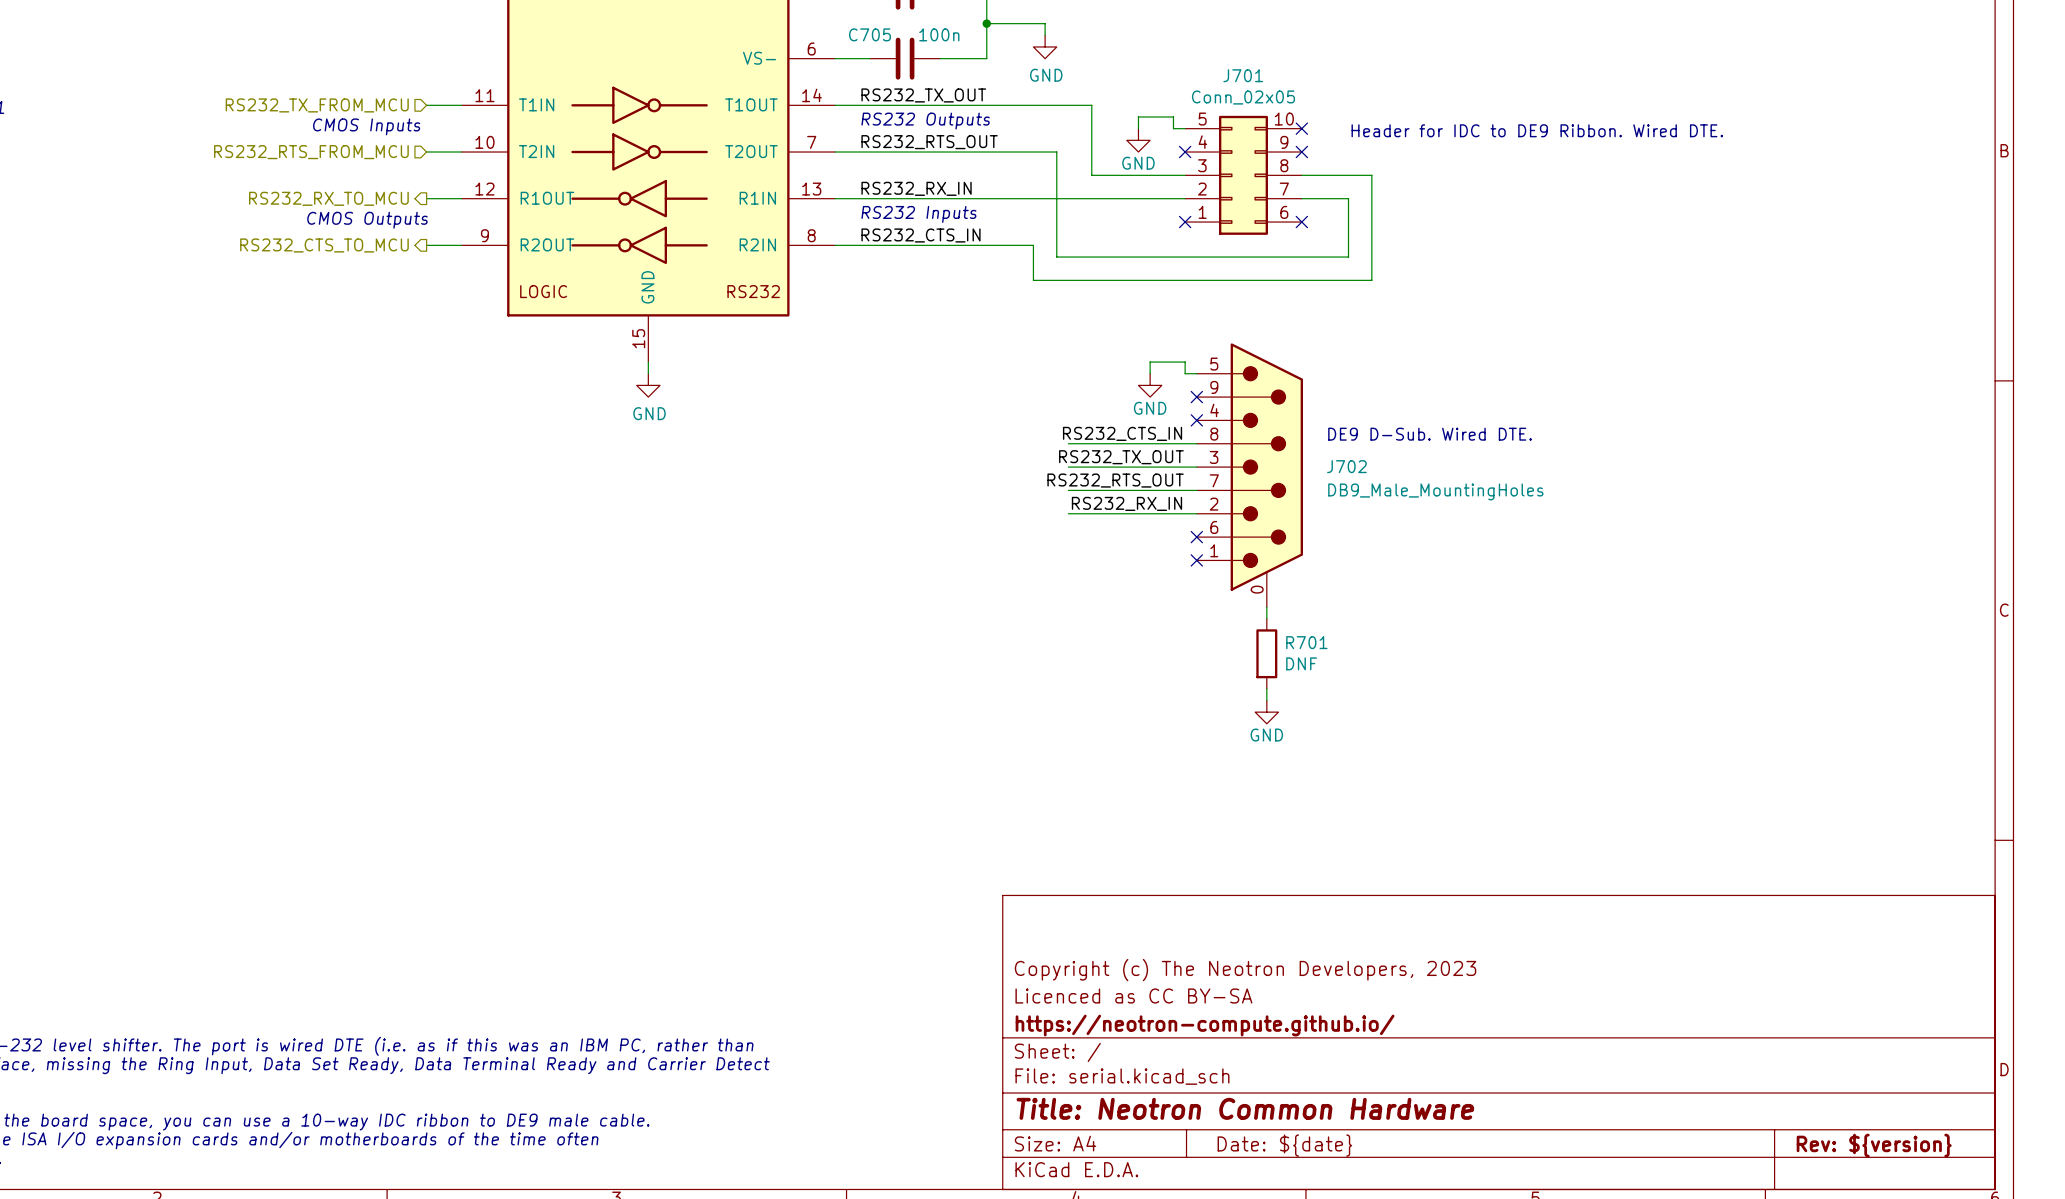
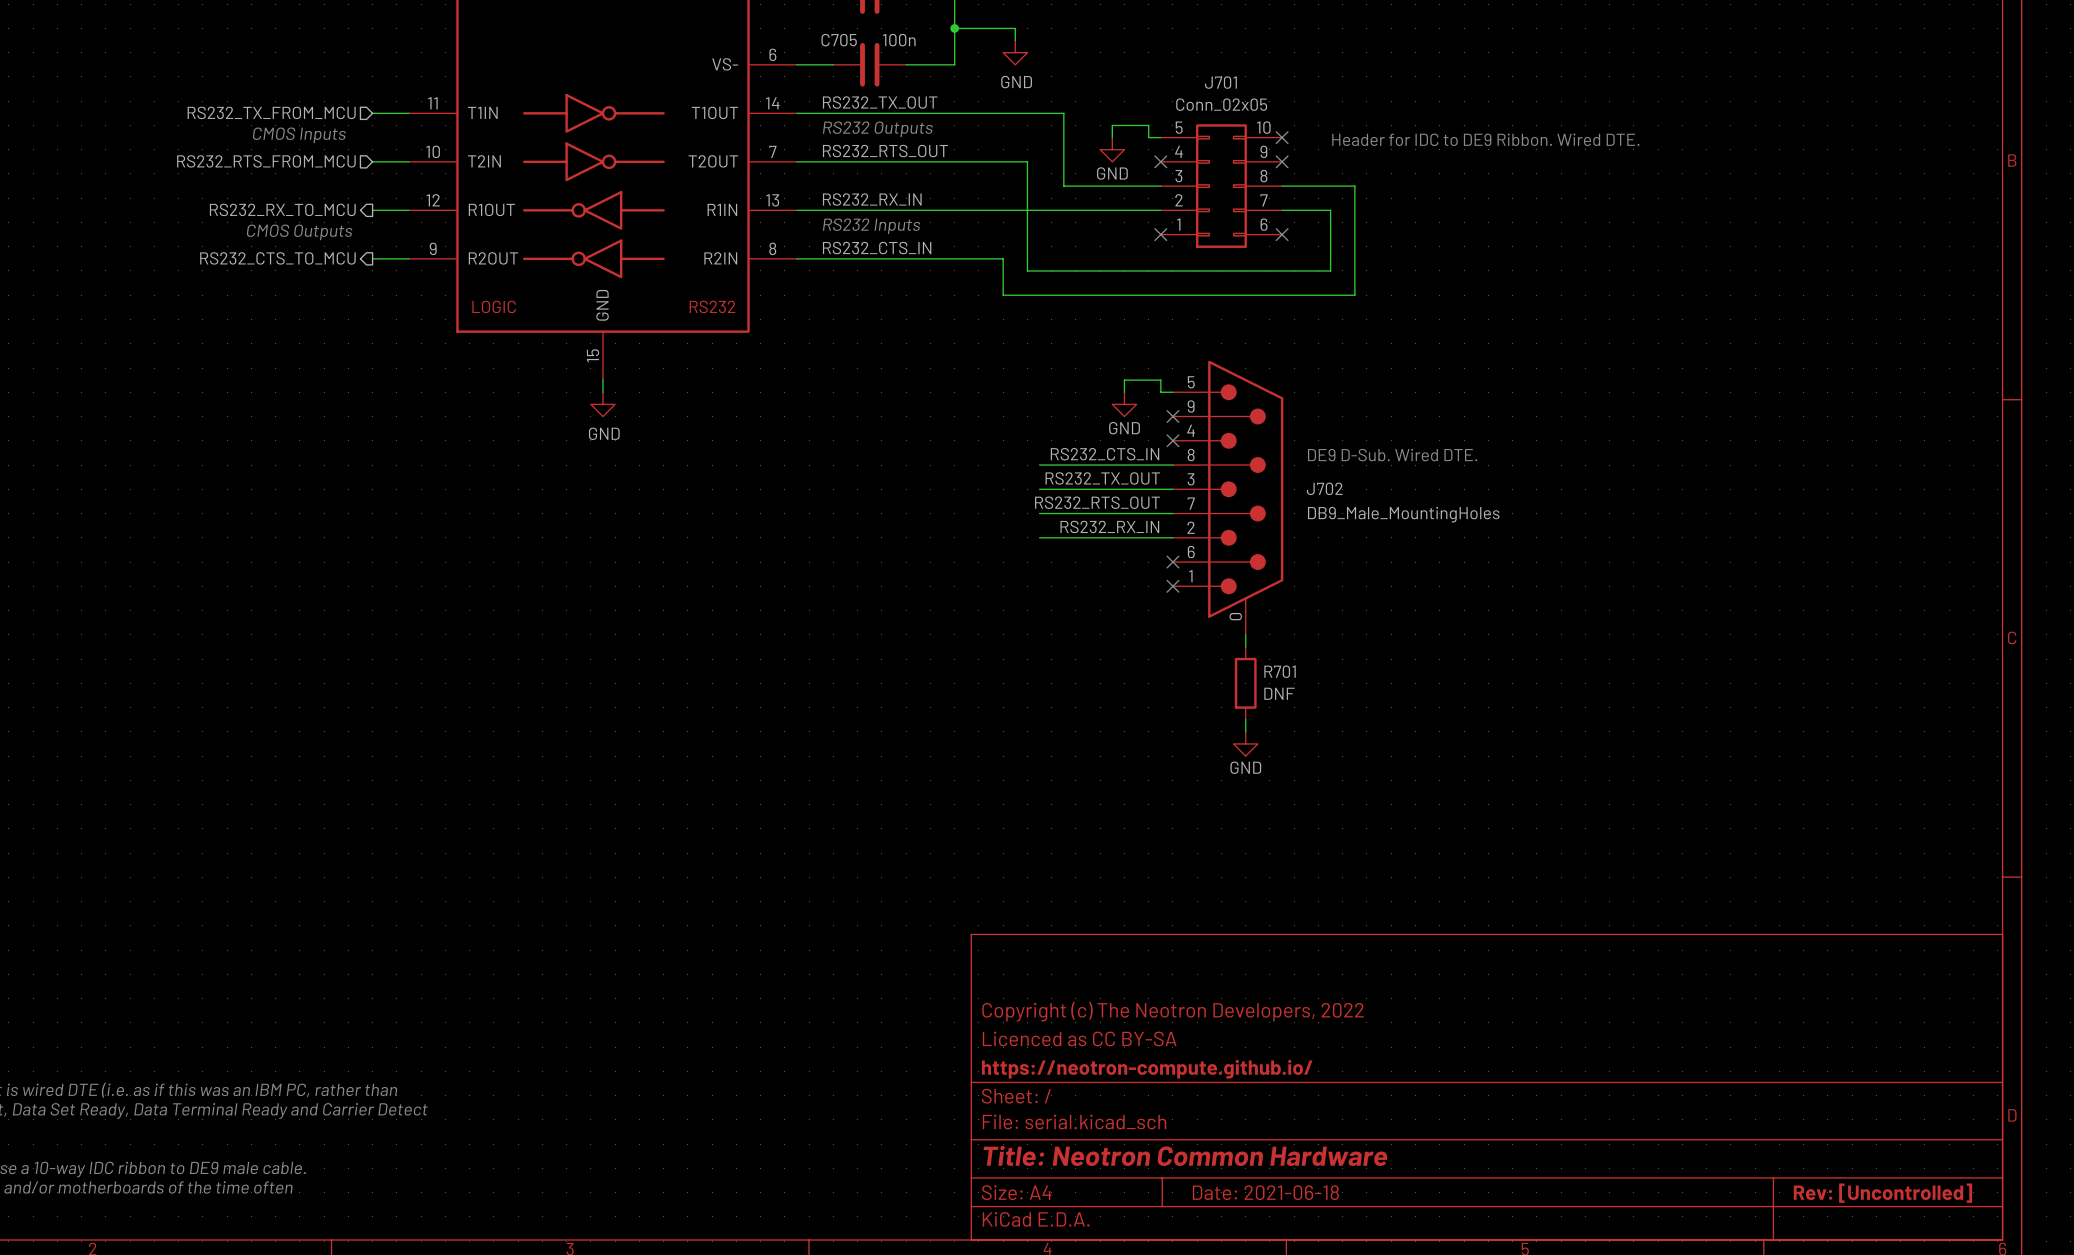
title block: Copyright (c) The Neotron Developers, 2023 (1245, 970) -> Copyright (c) The Neotron Developers, 2022 (1173, 1011)
title block: Date: ${date} (1284, 1145) -> Date: 2021-06-18 (1265, 1192)
title block: Rev: ${version} (1874, 1145) -> Rev: [Uncontrolled] (1882, 1193)

